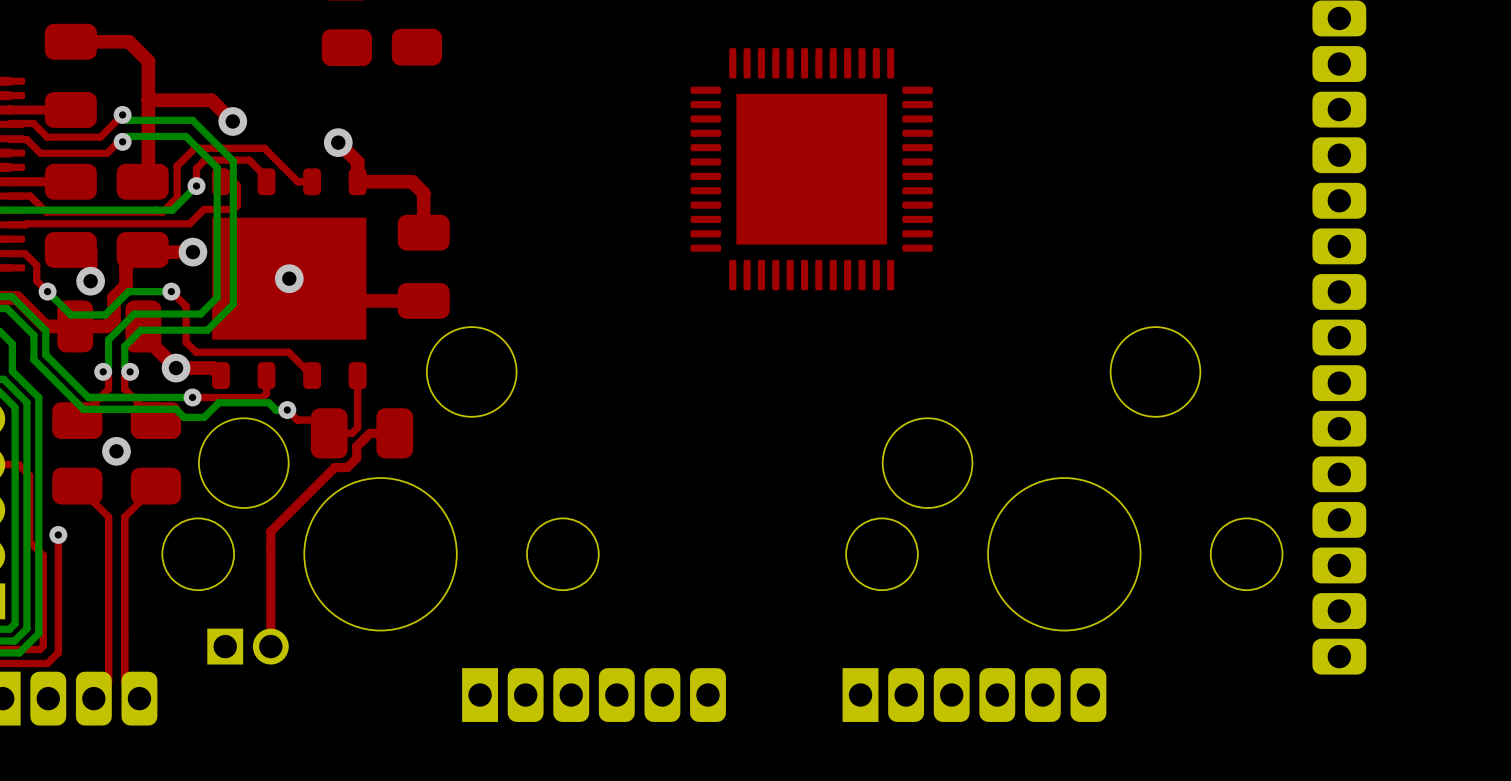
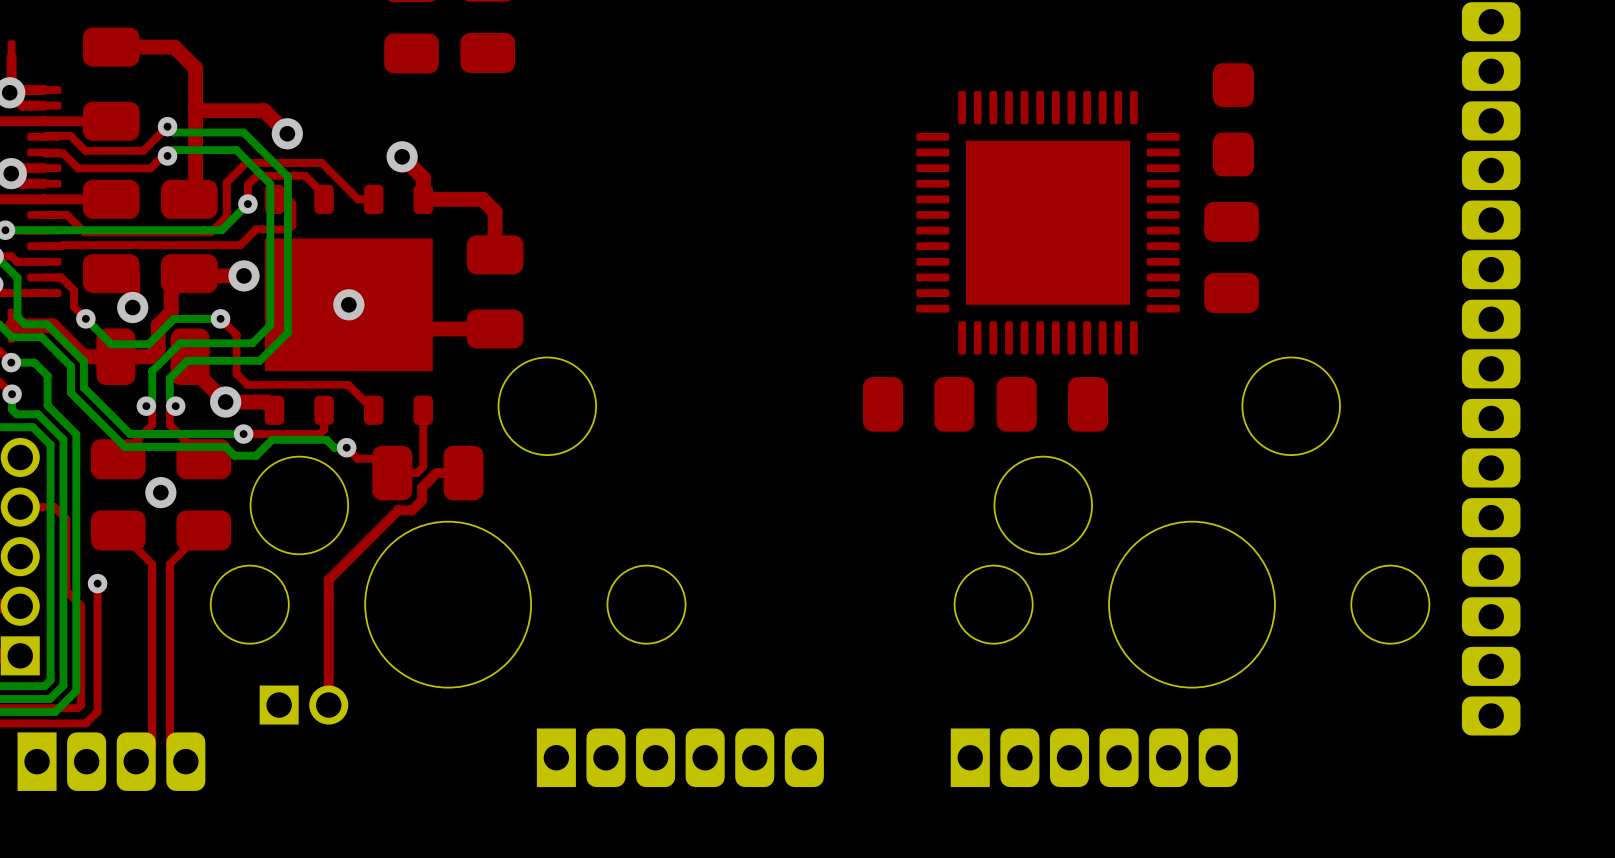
part: none -> (1233, 119)
part position: (811, 169) -> (1048, 222)
part: none -> (1231, 257)
part: none -> (918, 404)
part: none -> (1052, 404)

